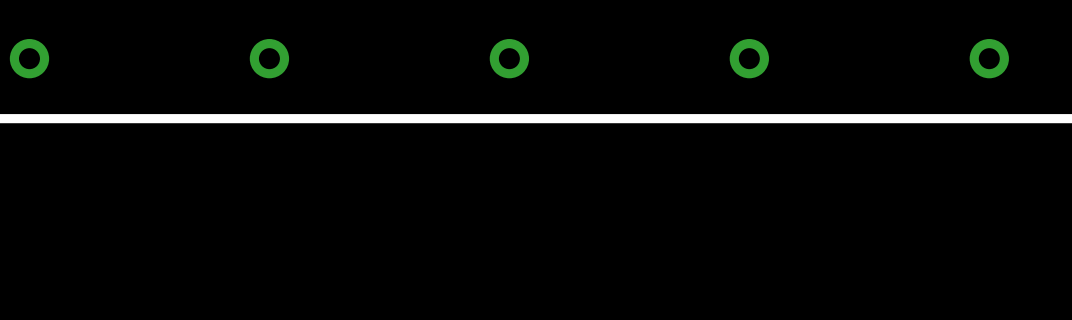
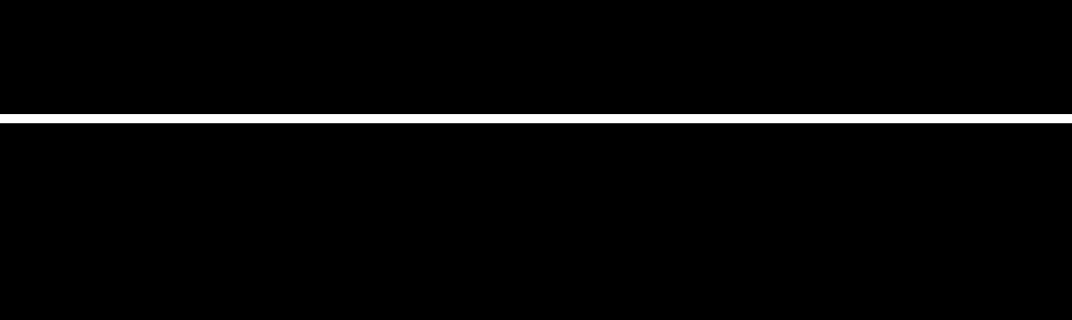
via: (29, 58) -> none
via: (269, 58) -> none
via: (509, 58) -> none
via: (749, 58) -> none
via: (989, 58) -> none

